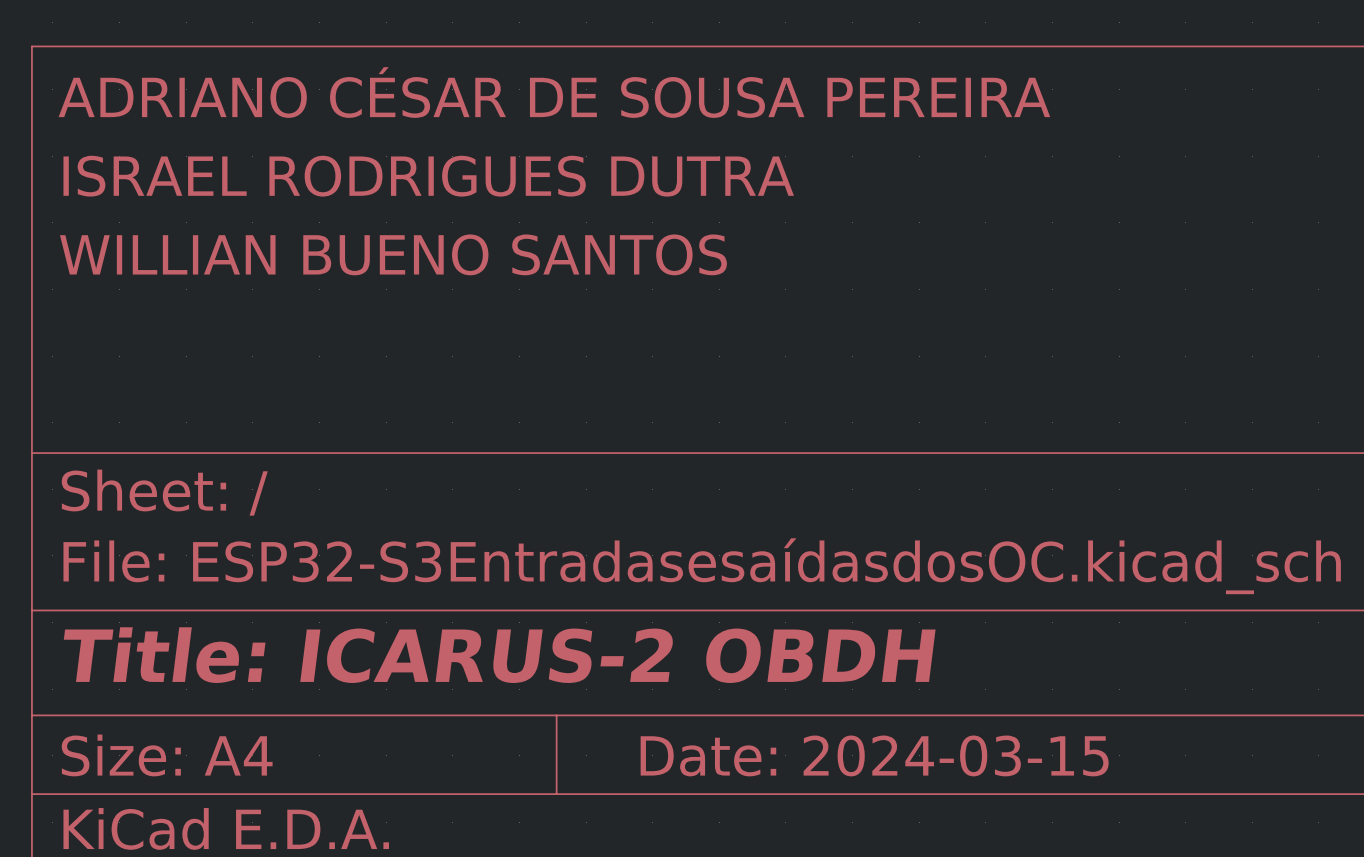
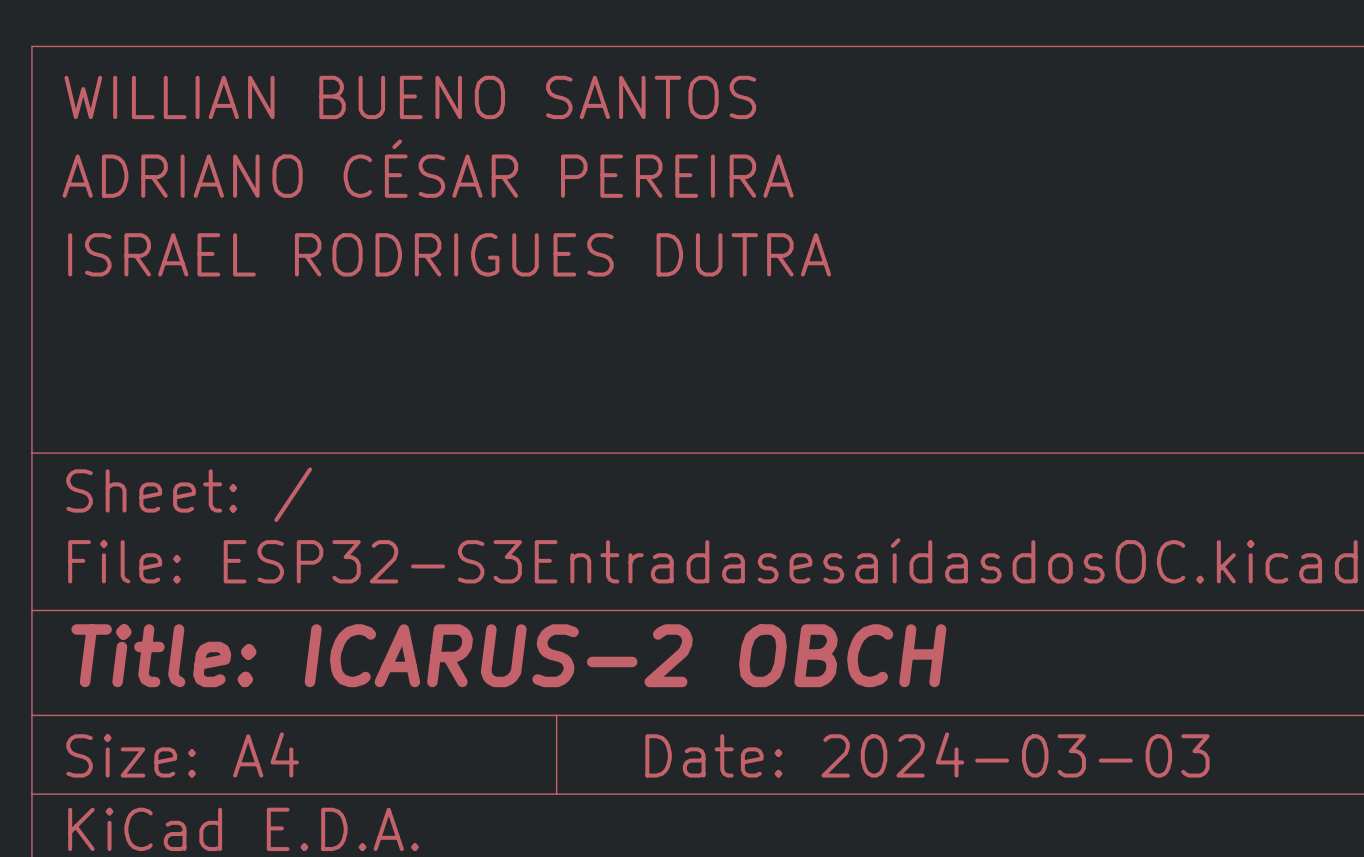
title block: ADRIANO CÉSAR DE SOUSA PEREIRA (554, 92) -> WILLIAN BUENO SANTOS (410, 97)
title block: ISRAEL RODRIGUES DUTRA (428, 176) -> ADRIANO CÉSAR PEREIRA (428, 168)
title block: WILLIAN BUENO SANTOS (393, 254) -> ISRAEL RODRIGUES DUTRA (449, 254)
title block: Title: ICARUS-2 OBDH (499, 655) -> Title: ICARUS-2 OBCH (508, 655)
title block: Date: 2024-03-15 (874, 755) -> Date: 2024-03-03 (927, 754)

